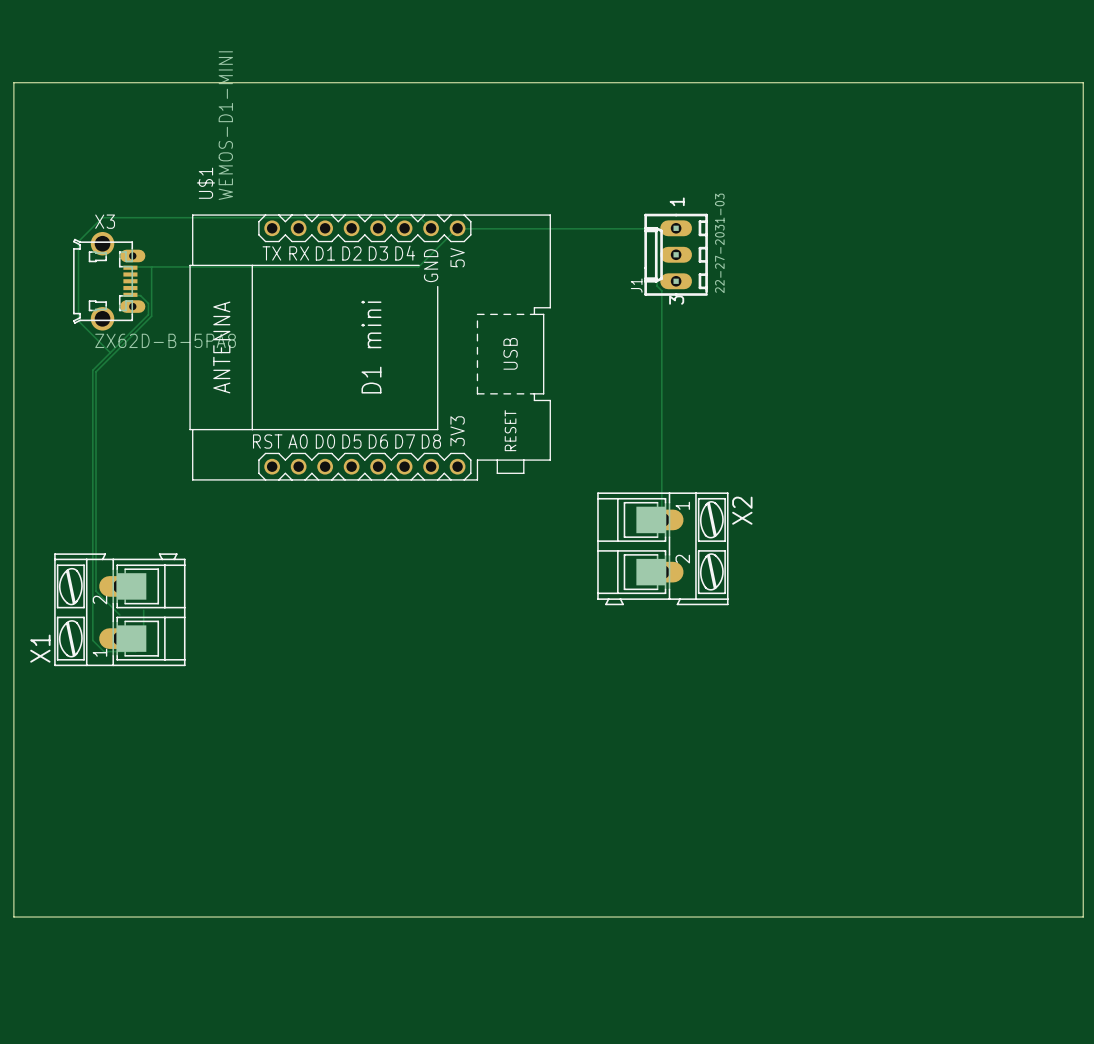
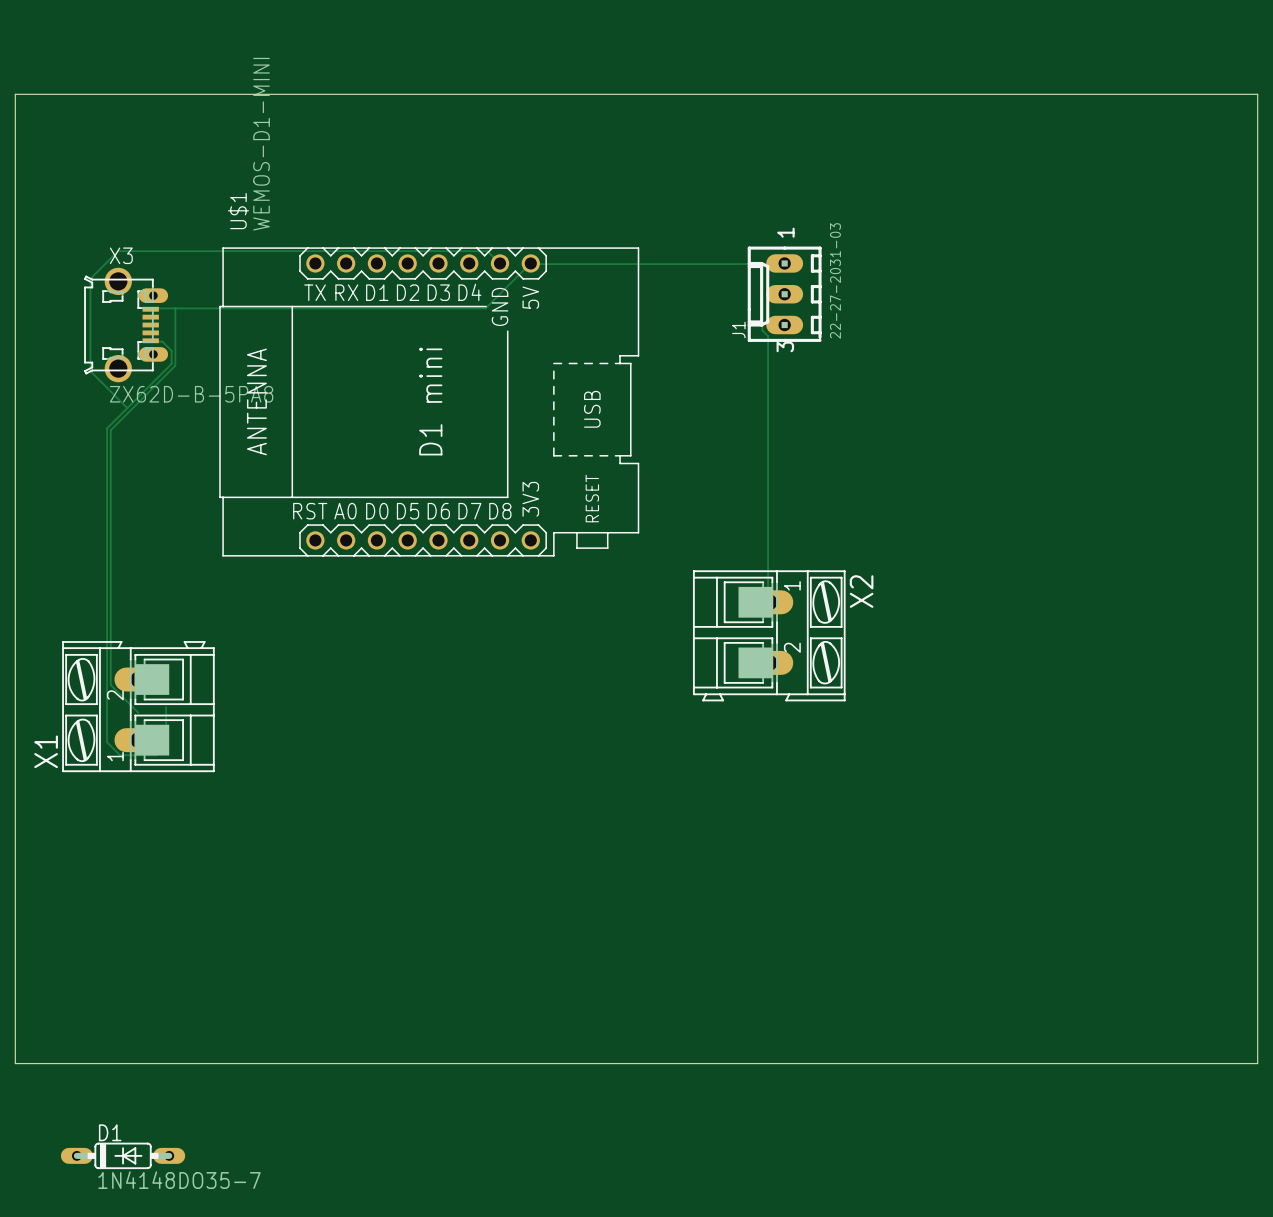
D1: none -> 1N4148DO35-7 (123, 1155)

